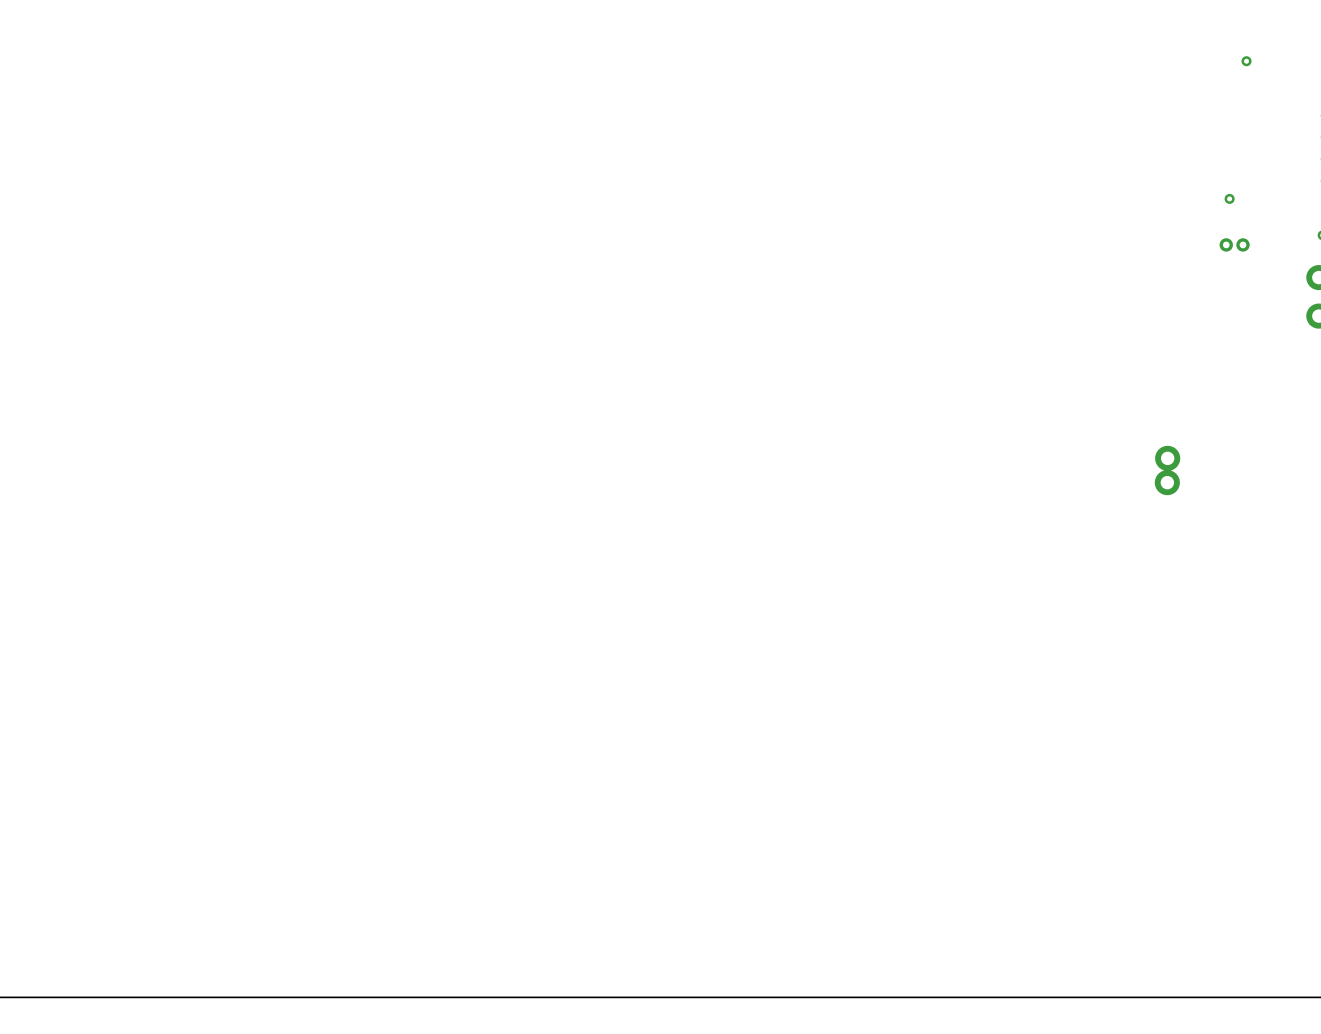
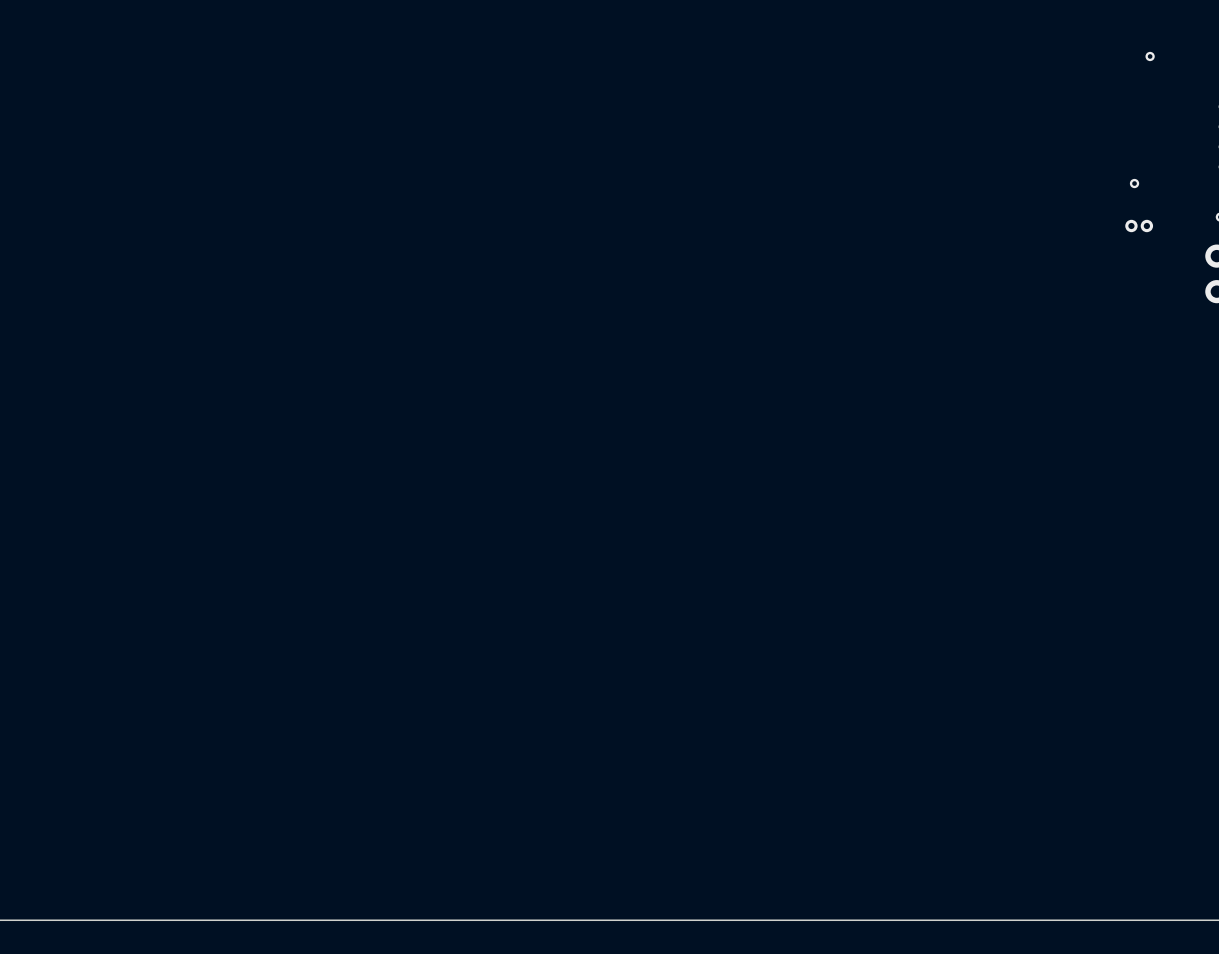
via: (1167, 458) -> none
via: (1167, 482) -> none

